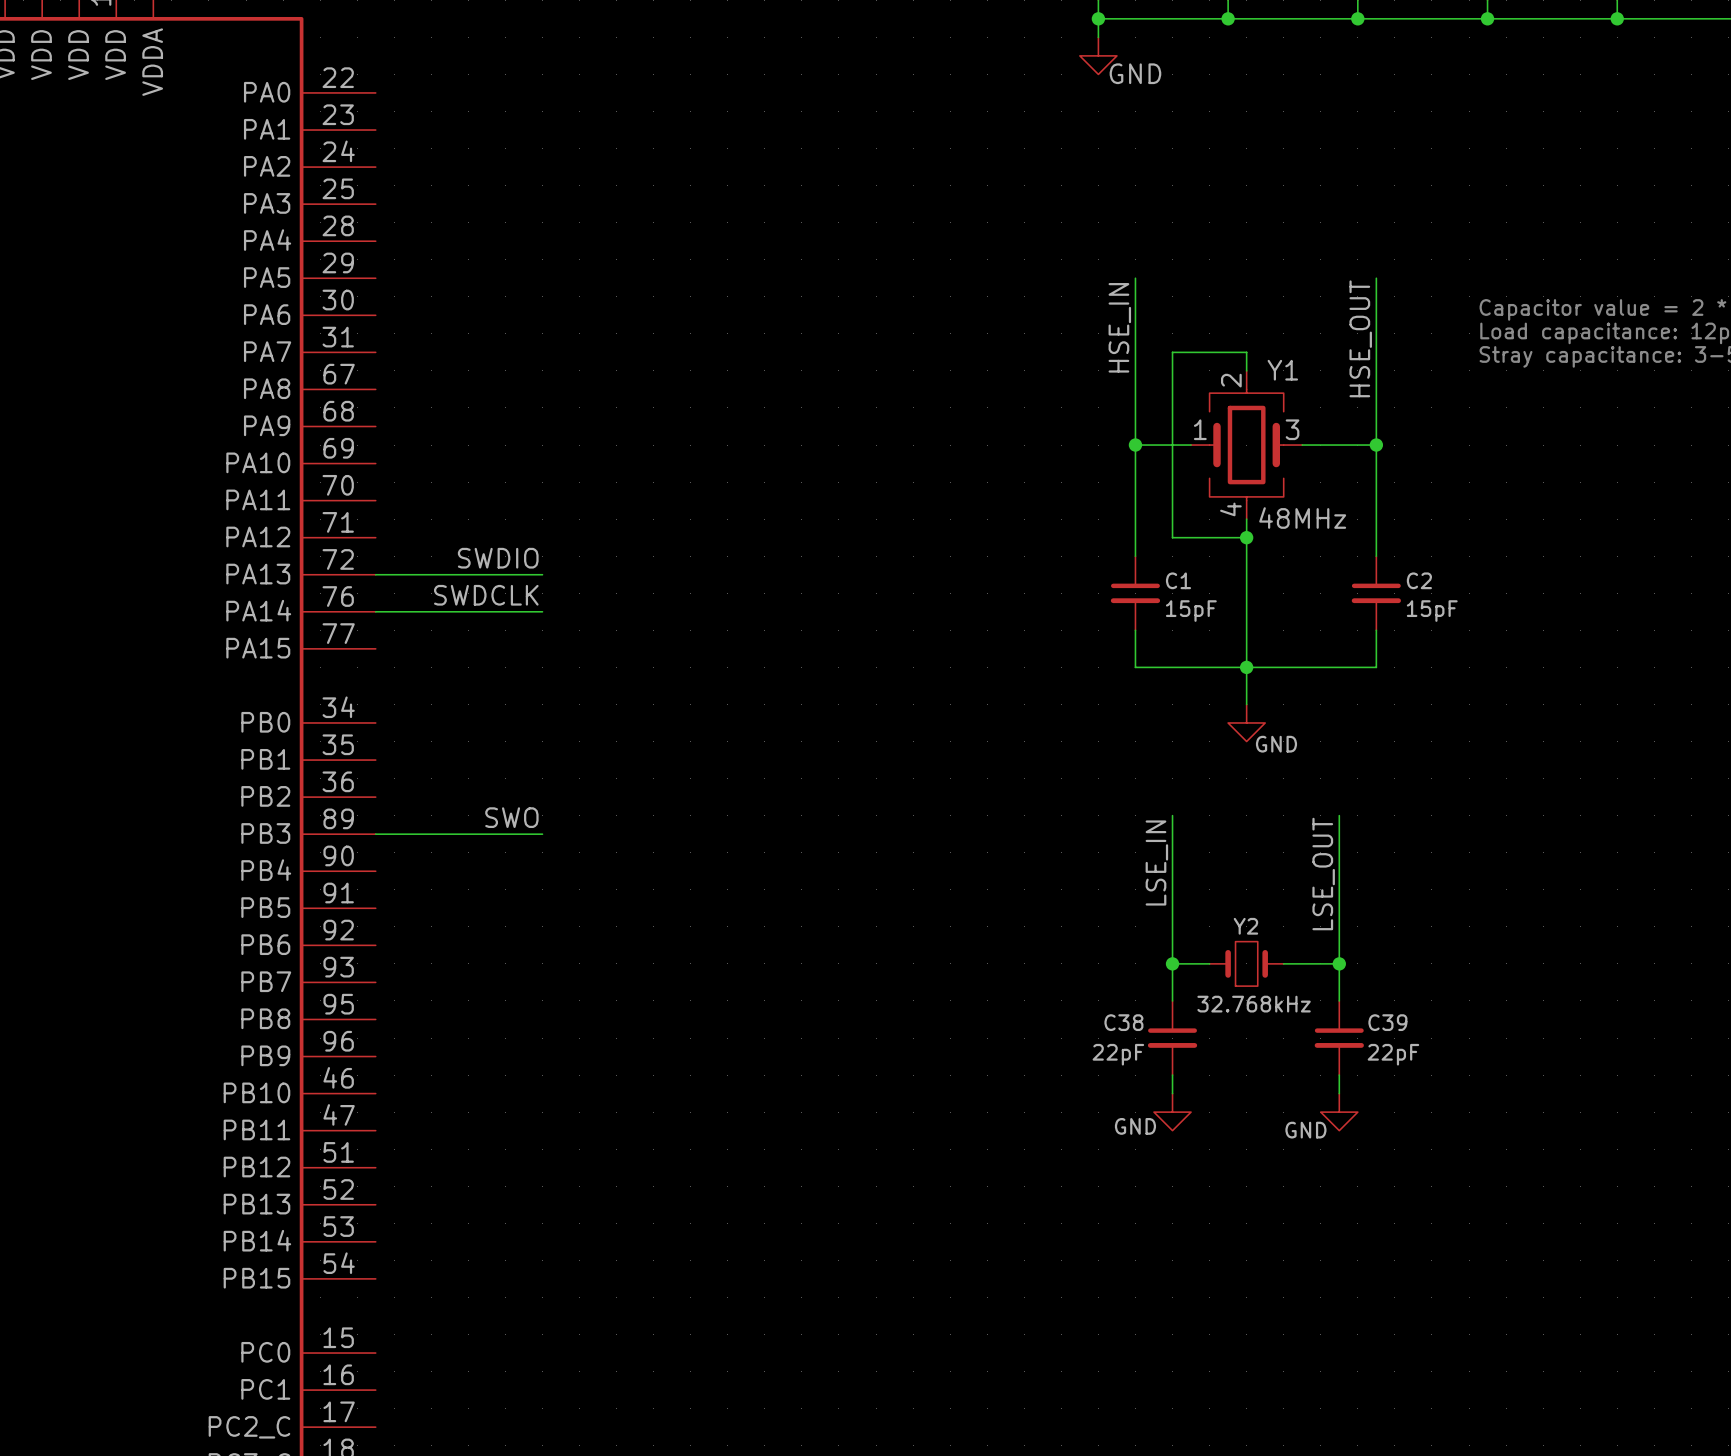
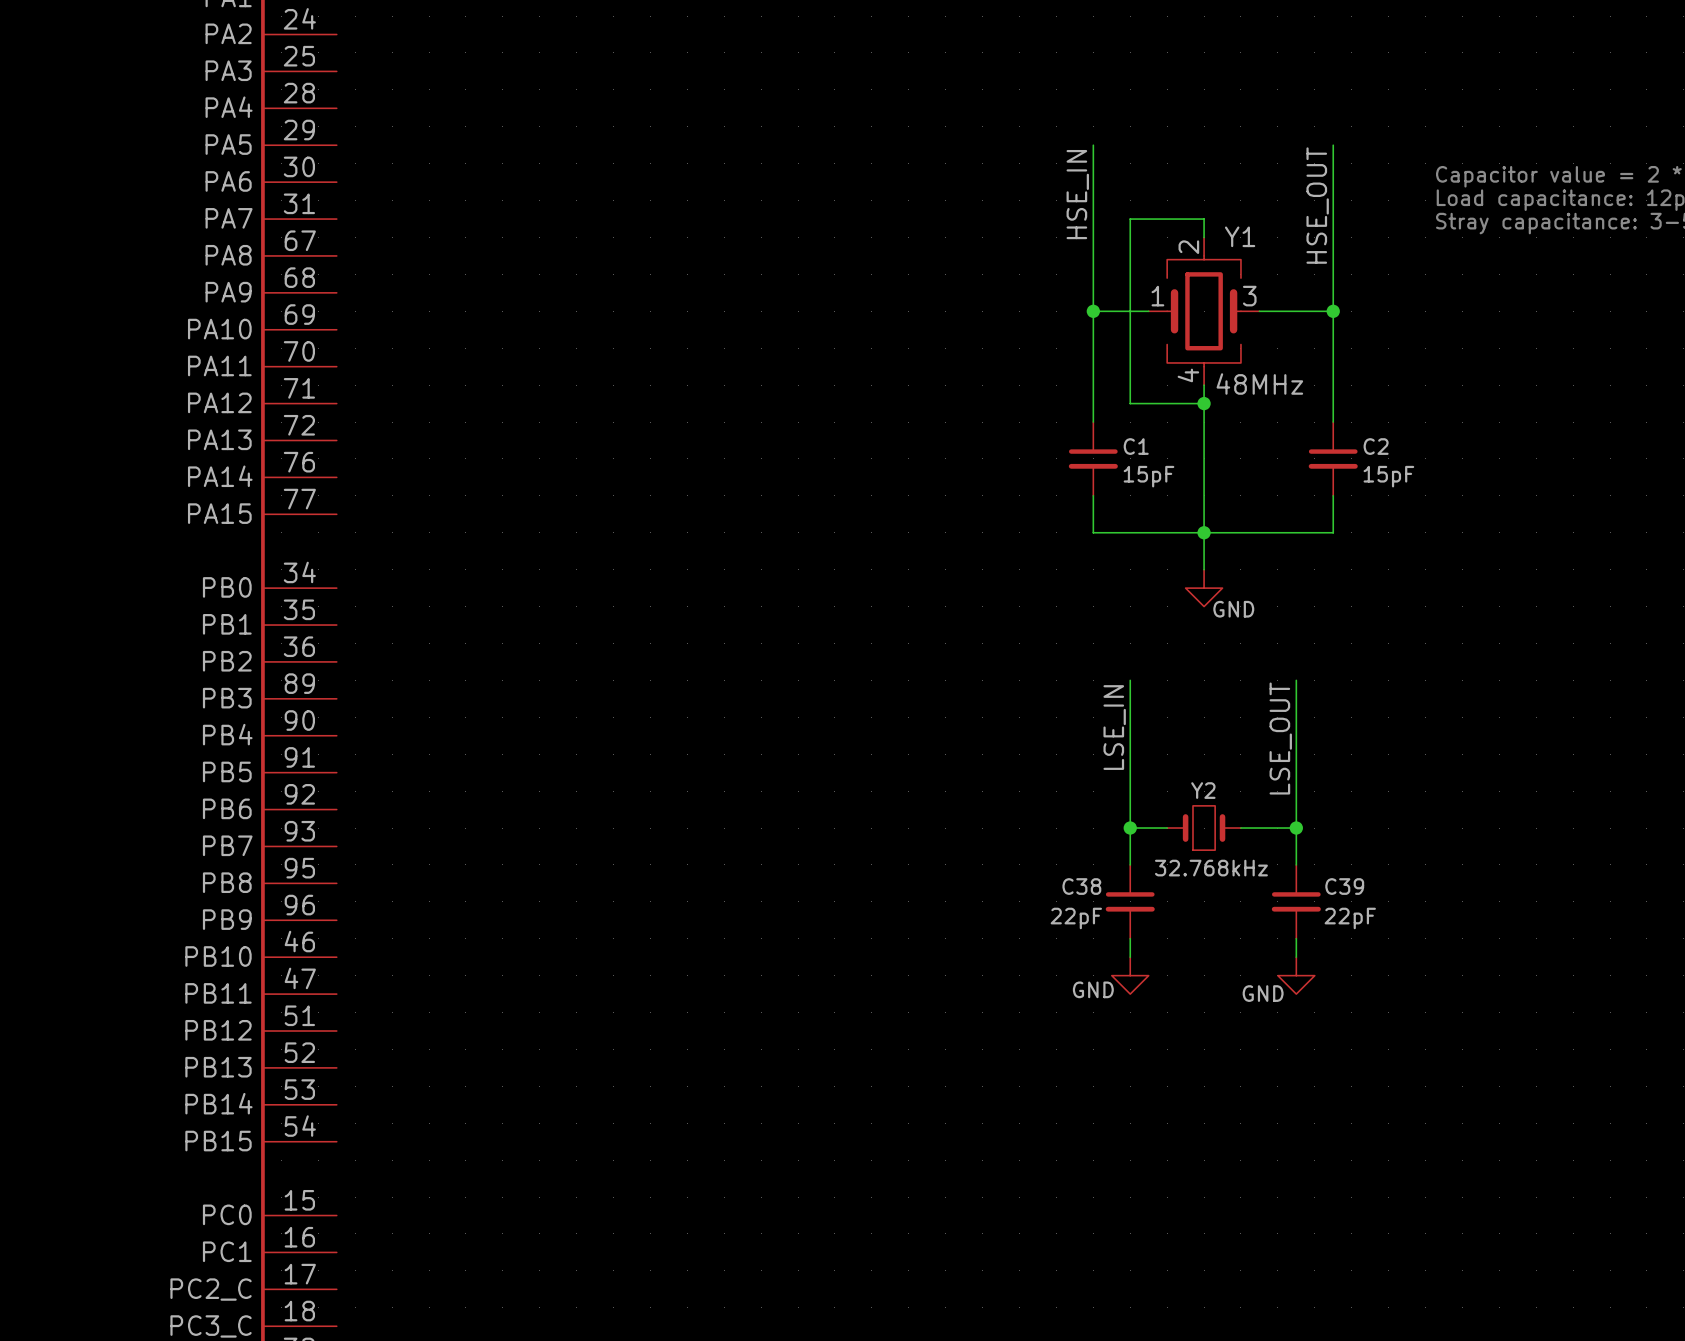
label: SWDIO (498, 558) -> none
wire: (375, 574) (542, 574) -> none
label: SWDCLK (486, 595) -> none
wire: (375, 611) (542, 611) -> none
label: SWO (511, 817) -> none
wire: (375, 834) (542, 834) -> none

